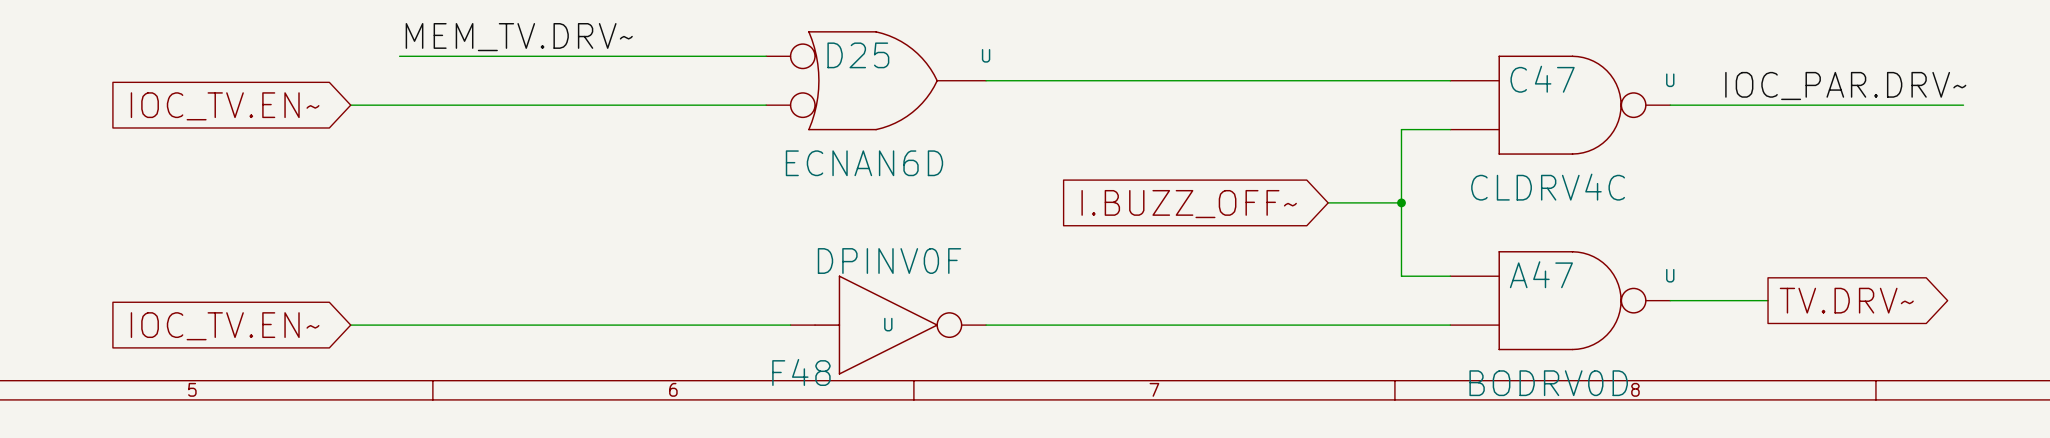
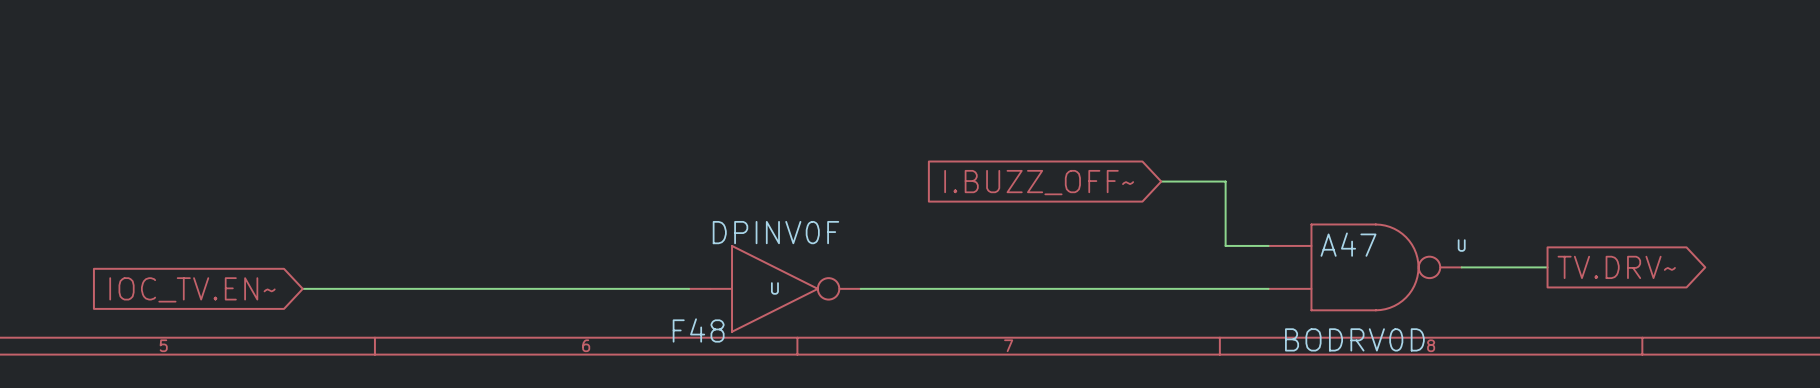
label: MEM_TV.DRV~ (519, 37) -> none
wire: (399, 56) (766, 56) -> none
U: (876, 80) -> none
wire: (986, 80) (1450, 80) -> none
label: IOC_PAR.DRV~ (1845, 85) -> none
wire: (350, 105) (766, 105) -> none
U: (1560, 105) -> none
wire: (1670, 105) (1963, 105) -> none
global label: IOC_TV.EN~ (225, 106) -> none
wire: (1450, 129) (1401, 129) (1401, 202) -> none
junction: (1401, 202) -> none

